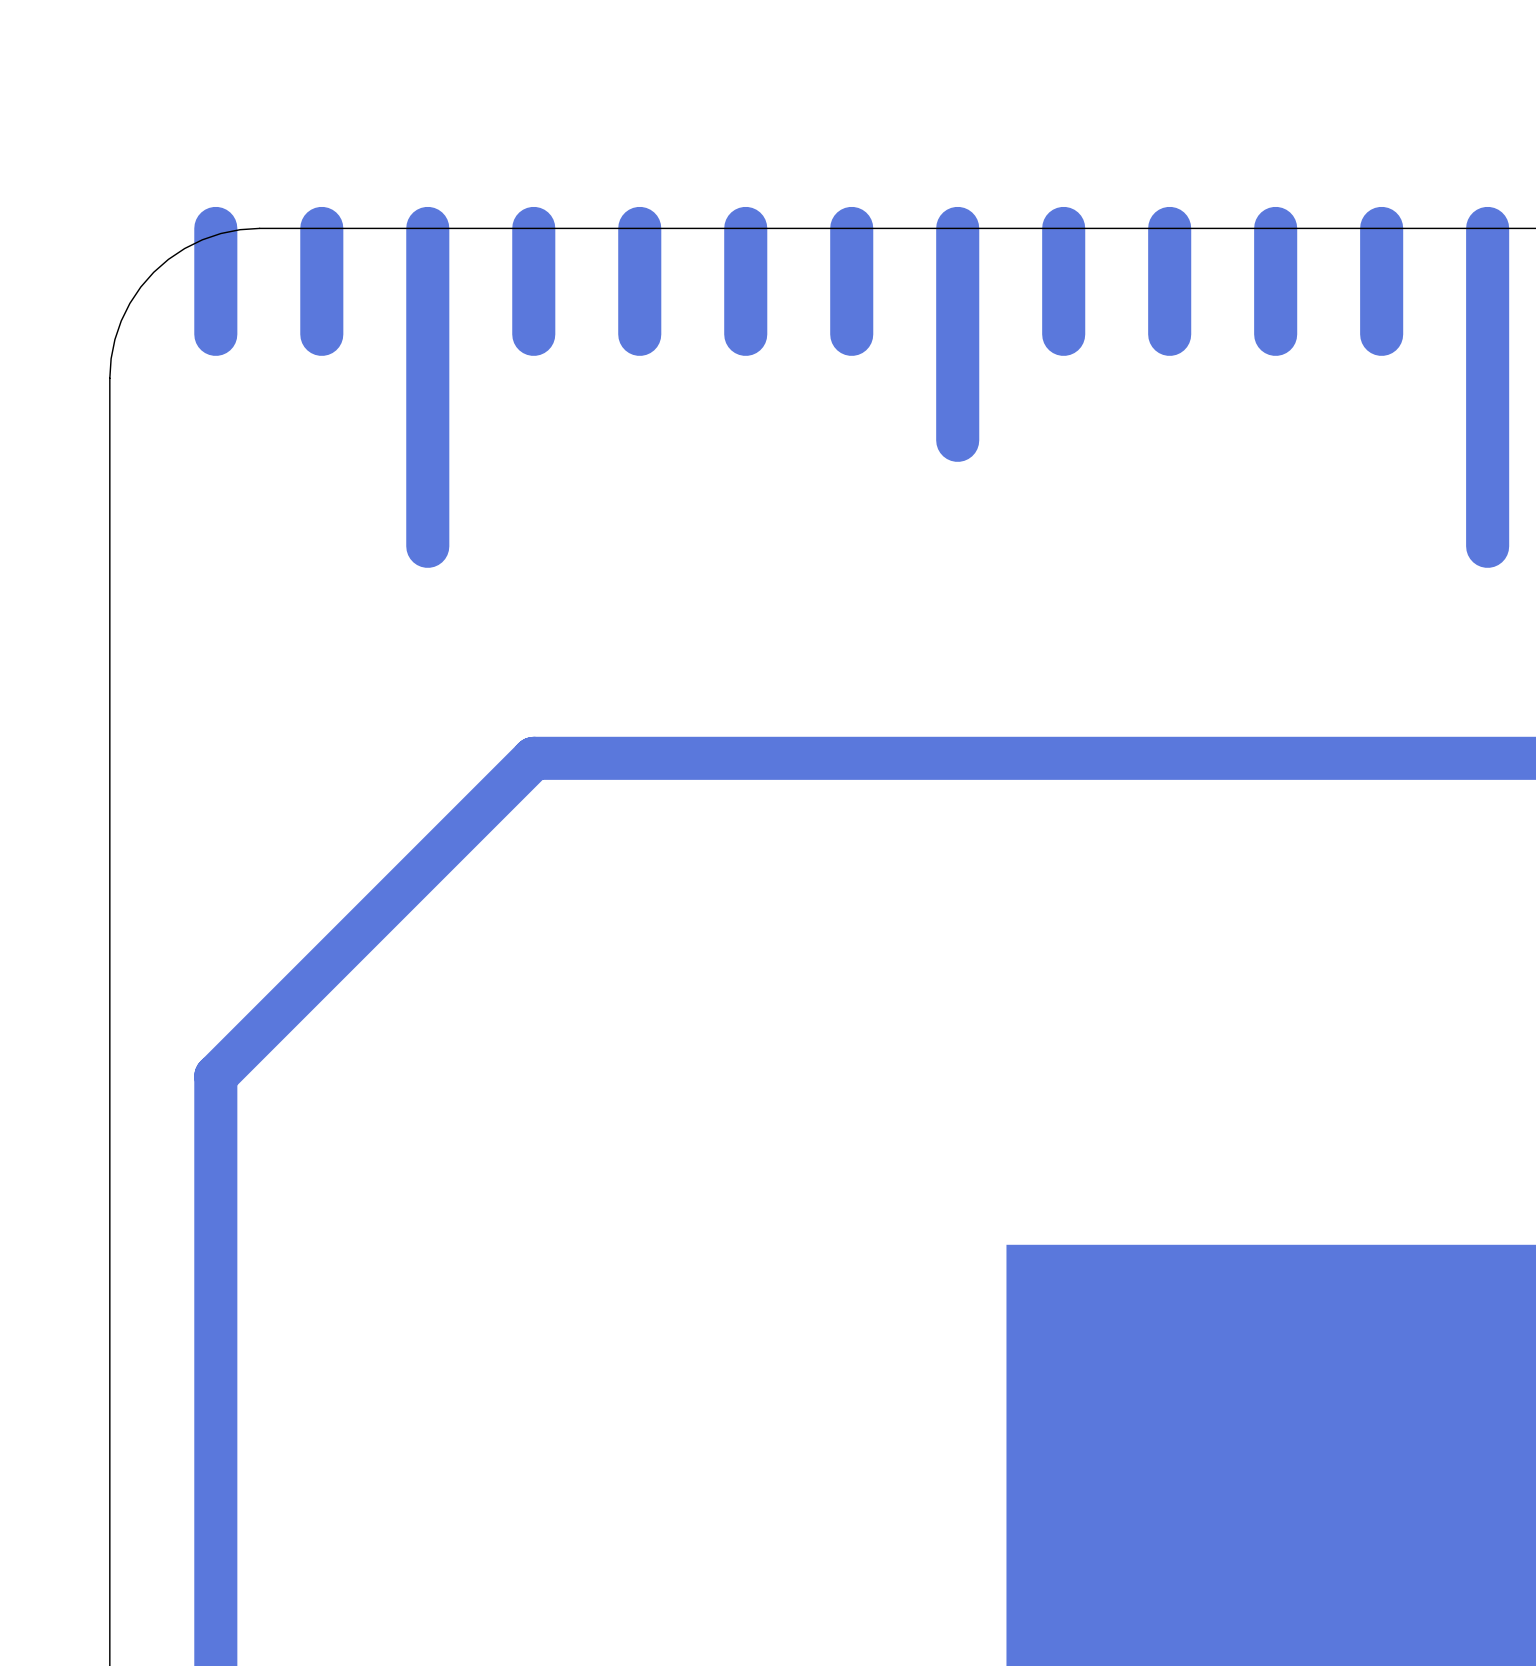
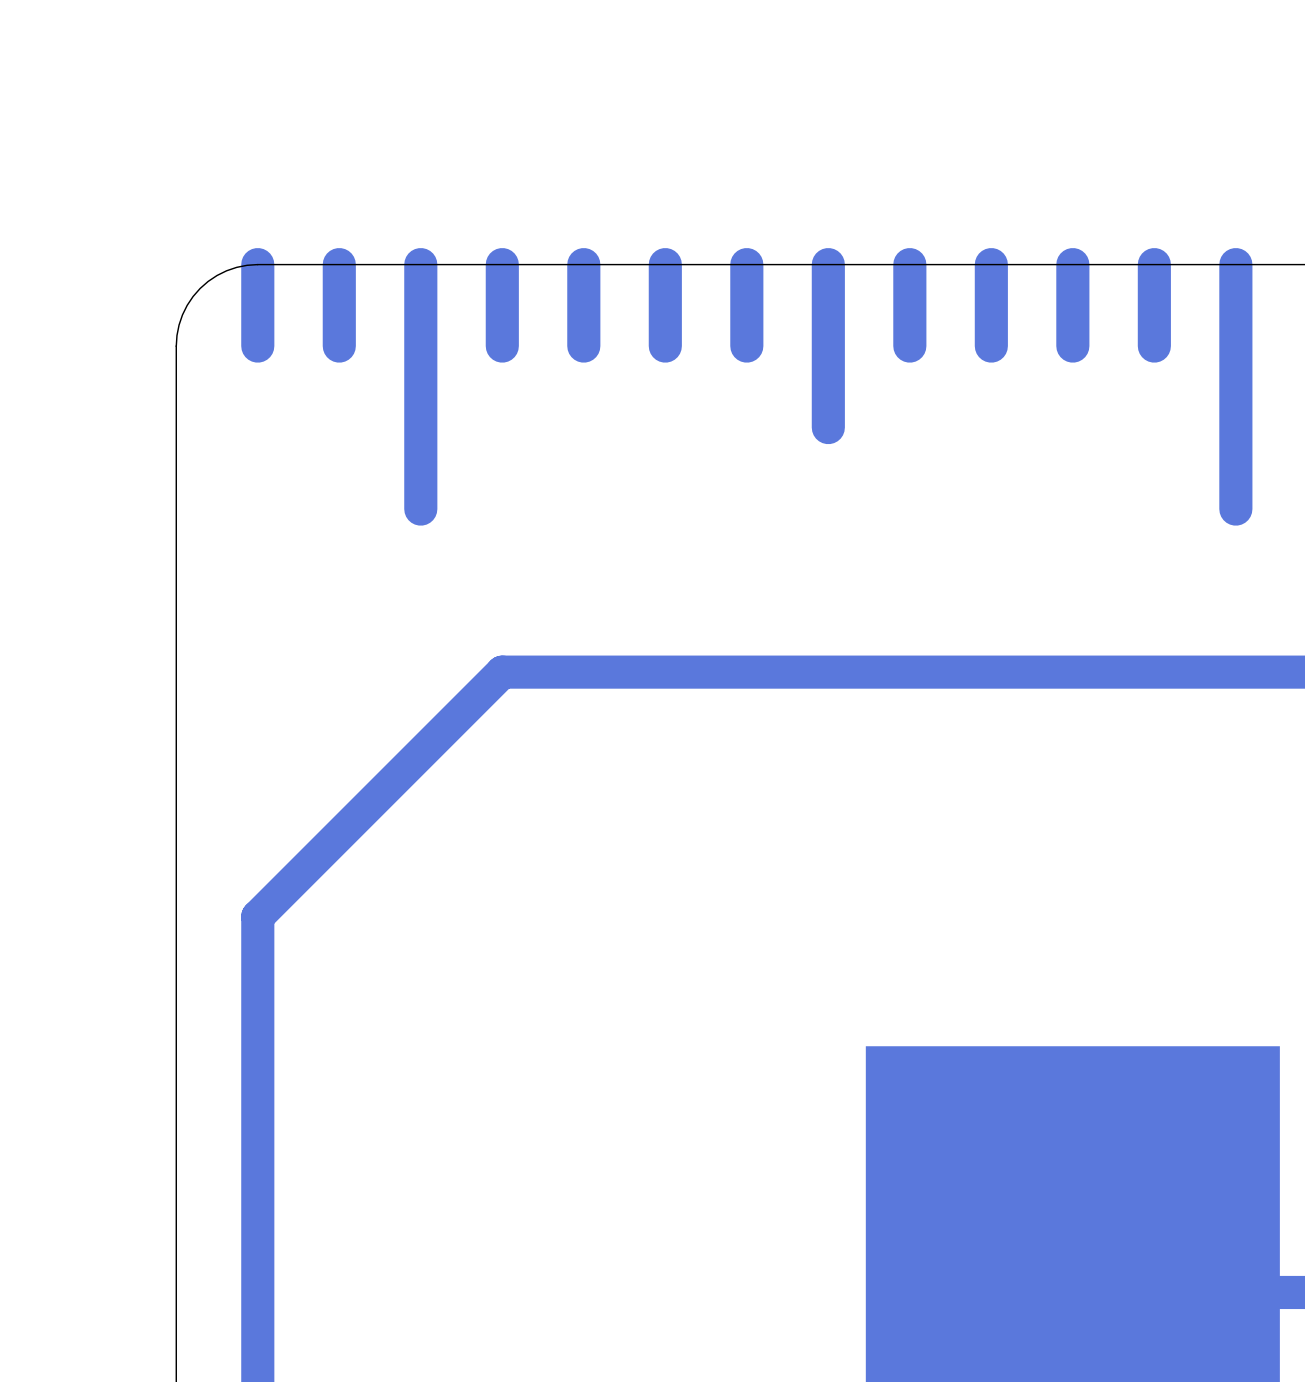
board edge: (259, 228) (240, 229) (202, 239) (168, 259) (153, 272) (140, 287) (121, 320) (111, 358) (109, 378) -> (291, 264) (257, 264) (236, 267) (217, 275) (200, 288) (187, 305) (179, 325) (176, 346) (176, 379)

